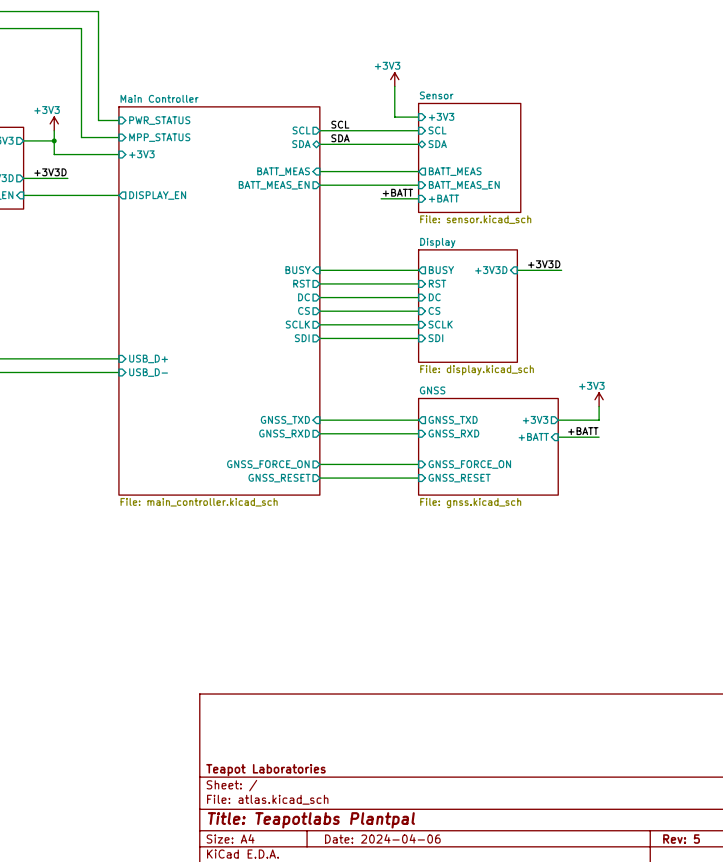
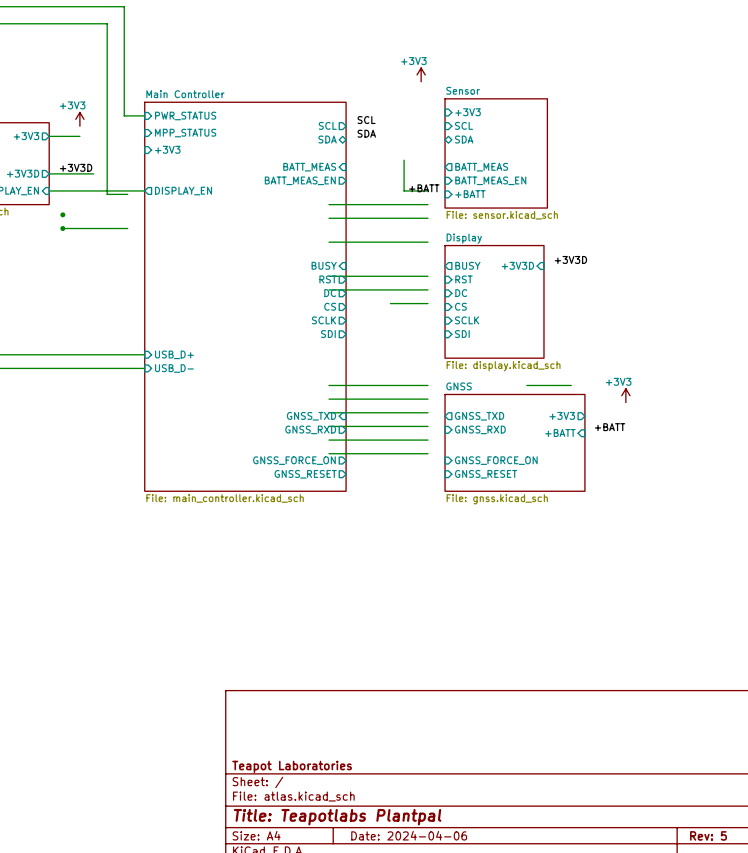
wire: (394, 86) (394, 117) (418, 117) -> (404, 160) (404, 190) (427, 190)
wire: (54, 130) (54, 154) (118, 154) -> none
wire: (319, 130) (418, 130) -> (329, 204) (427, 204)
wire: (81, 137) (118, 137) -> (107, 132) (107, 194) (127, 194)
junction: (54, 140) -> none
wire: (319, 144) (418, 144) -> (329, 218) (427, 218)
wire: (319, 171) (418, 171) -> none
wire: (319, 185) (418, 185) -> (329, 242) (427, 242)
wire: (381, 198) (418, 198) -> (390, 303) (427, 303)
junction: none -> (62, 214)
wire: none -> (62, 228) (127, 228)
junction: none -> (62, 228)
wire: (319, 270) (418, 270) -> (329, 289) (427, 289)
wire: (517, 270) (561, 270) -> (526, 385) (571, 385)
wire: (319, 283) (418, 283) -> (329, 276) (427, 276)
wire: (319, 297) (418, 297) -> (329, 426) (427, 426)
wire: (319, 311) (418, 311) -> (329, 385) (427, 385)
wire: (319, 324) (418, 324) -> (329, 399) (427, 399)
wire: (319, 338) (418, 338) -> (329, 412) (427, 412)
wire: (599, 406) (599, 420) (558, 420) -> none
wire: (319, 420) (418, 420) -> (329, 453) (427, 453)
wire: (319, 433) (418, 433) -> (329, 440) (427, 440)
wire: (558, 437) (599, 437) -> none
wire: (319, 464) (418, 464) -> none
wire: (319, 478) (418, 478) -> none

